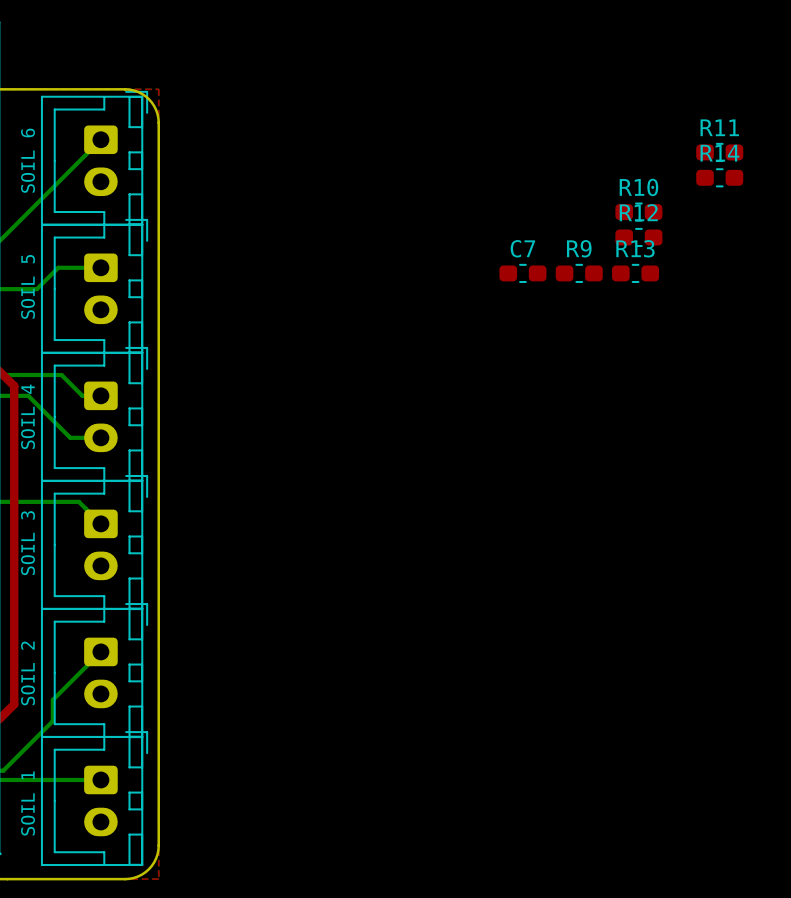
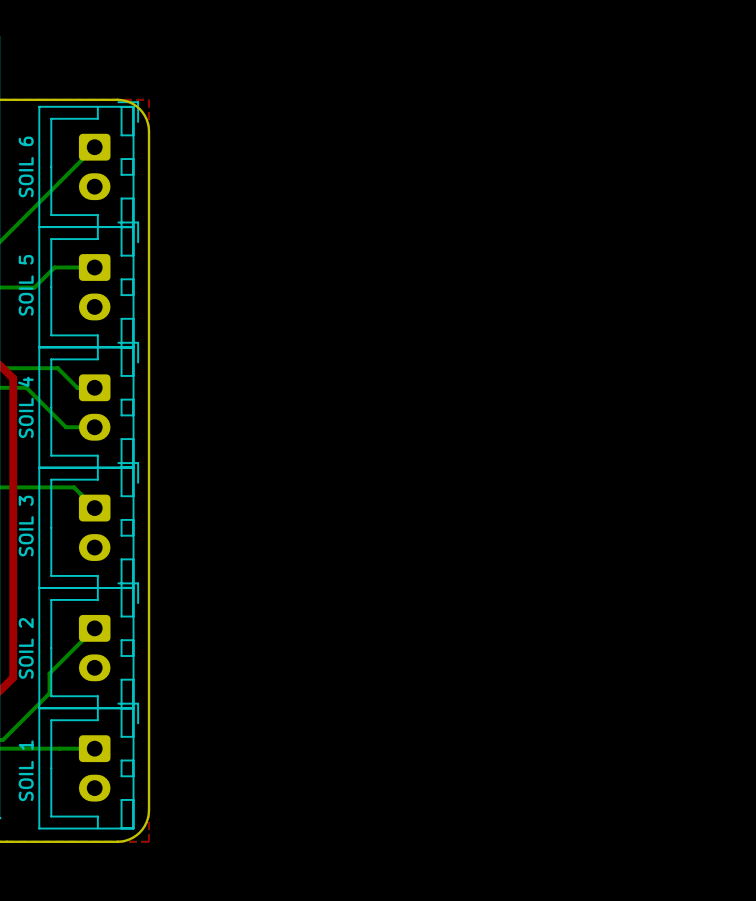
R11: (719, 152) -> none
R14: (719, 177) -> none
R10: (638, 212) -> none
R12: (638, 237) -> none
C7: (522, 273) -> none
R9: (579, 273) -> none
R13: (635, 273) -> none

